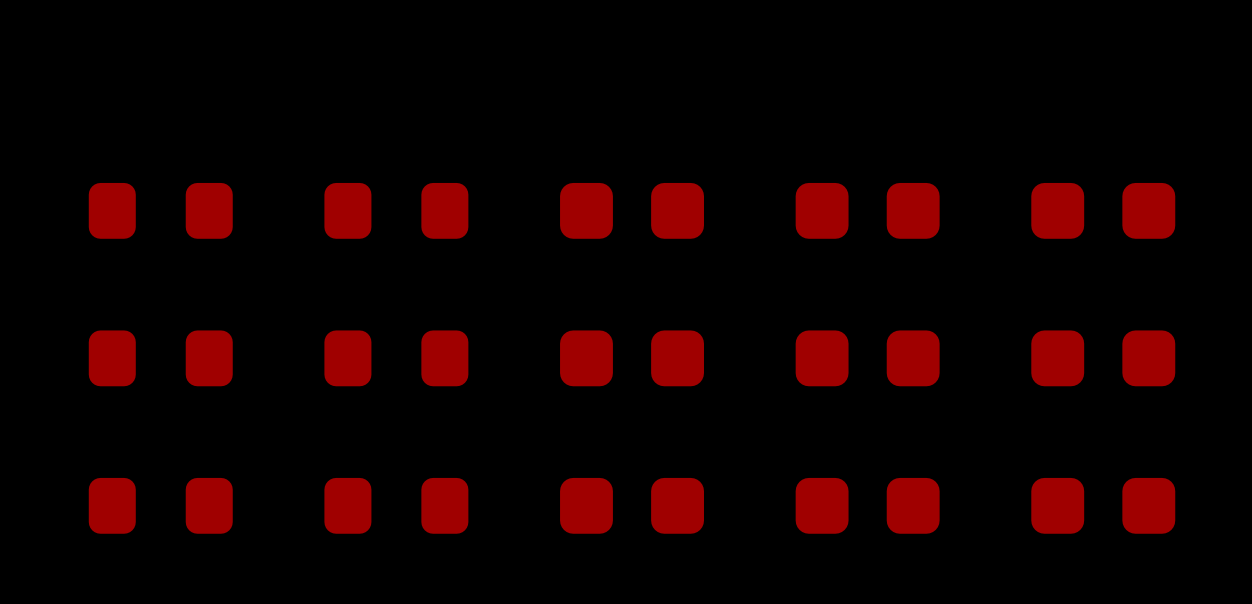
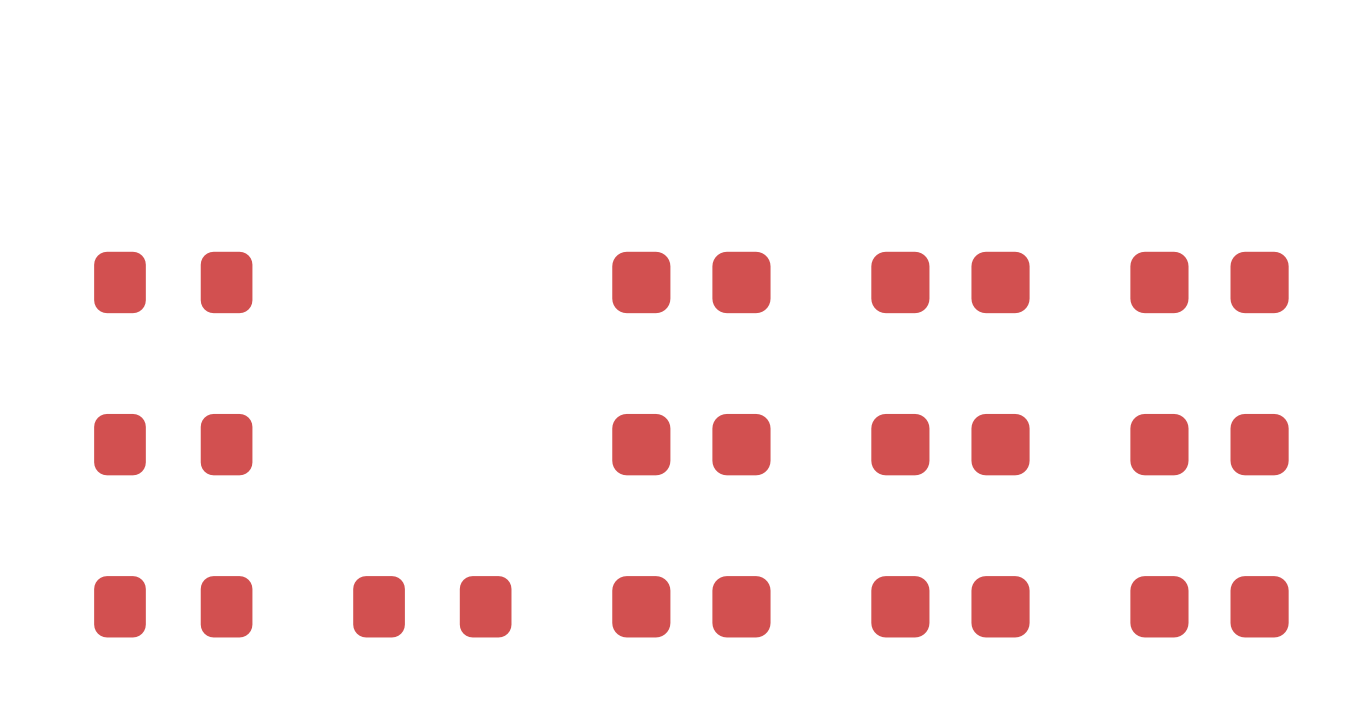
part: (396, 210) -> none
part: (396, 358) -> none

